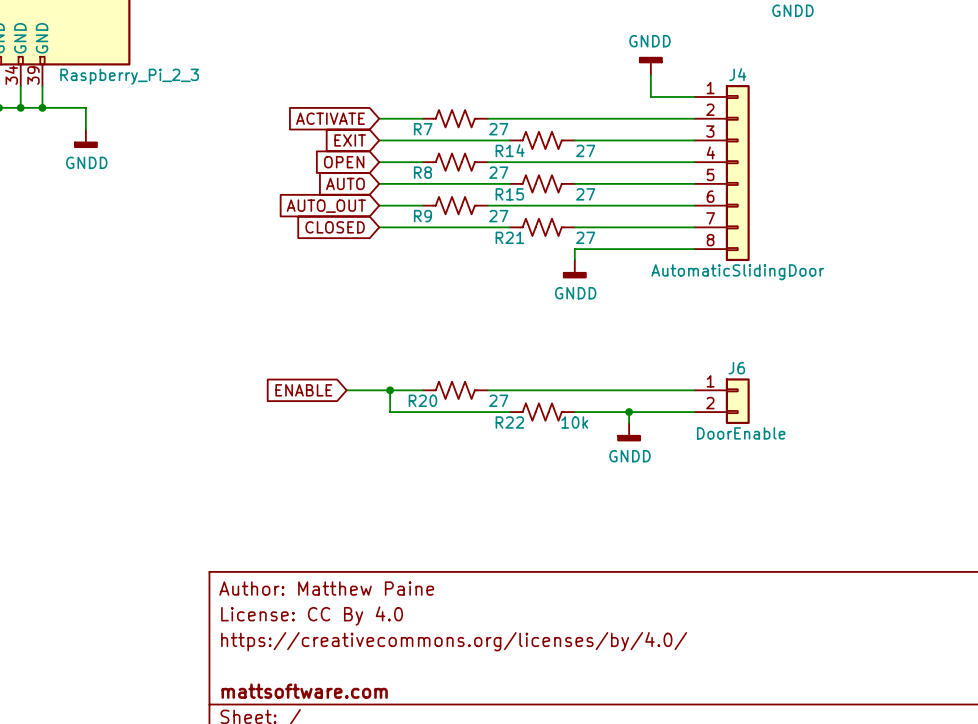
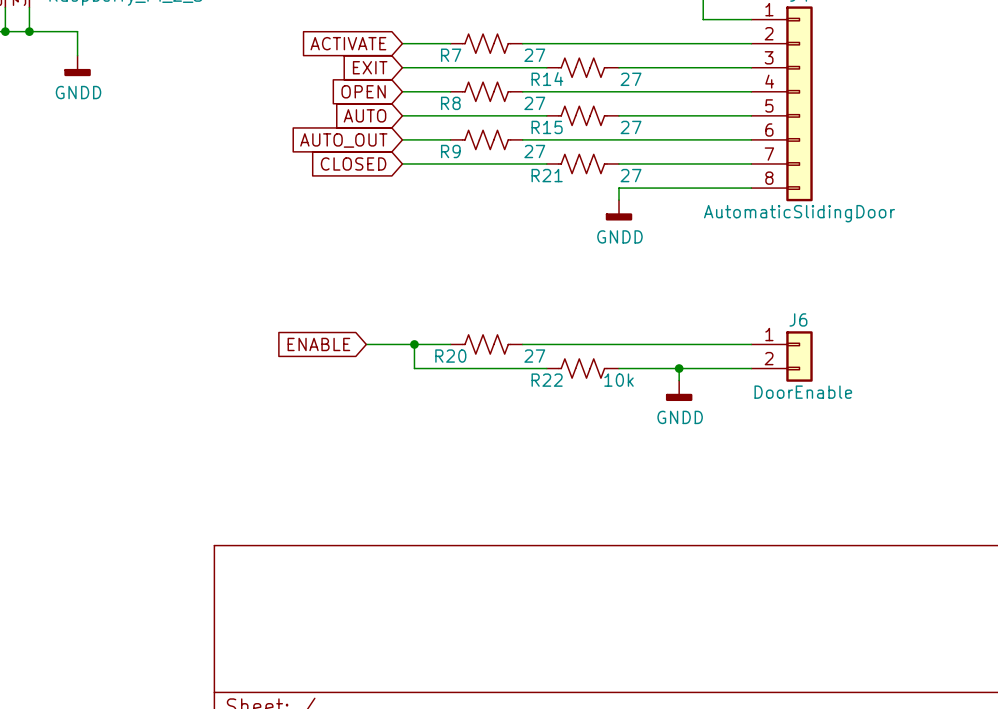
title block: Author: Matthew Paine (326, 588) -> none
title block: License: CC By 4.0 (312, 616) -> none
title block: https://creativecommons.org/licenses/by/4.0/ (454, 641) -> none
title block: mattsoftware.com (304, 691) -> none

